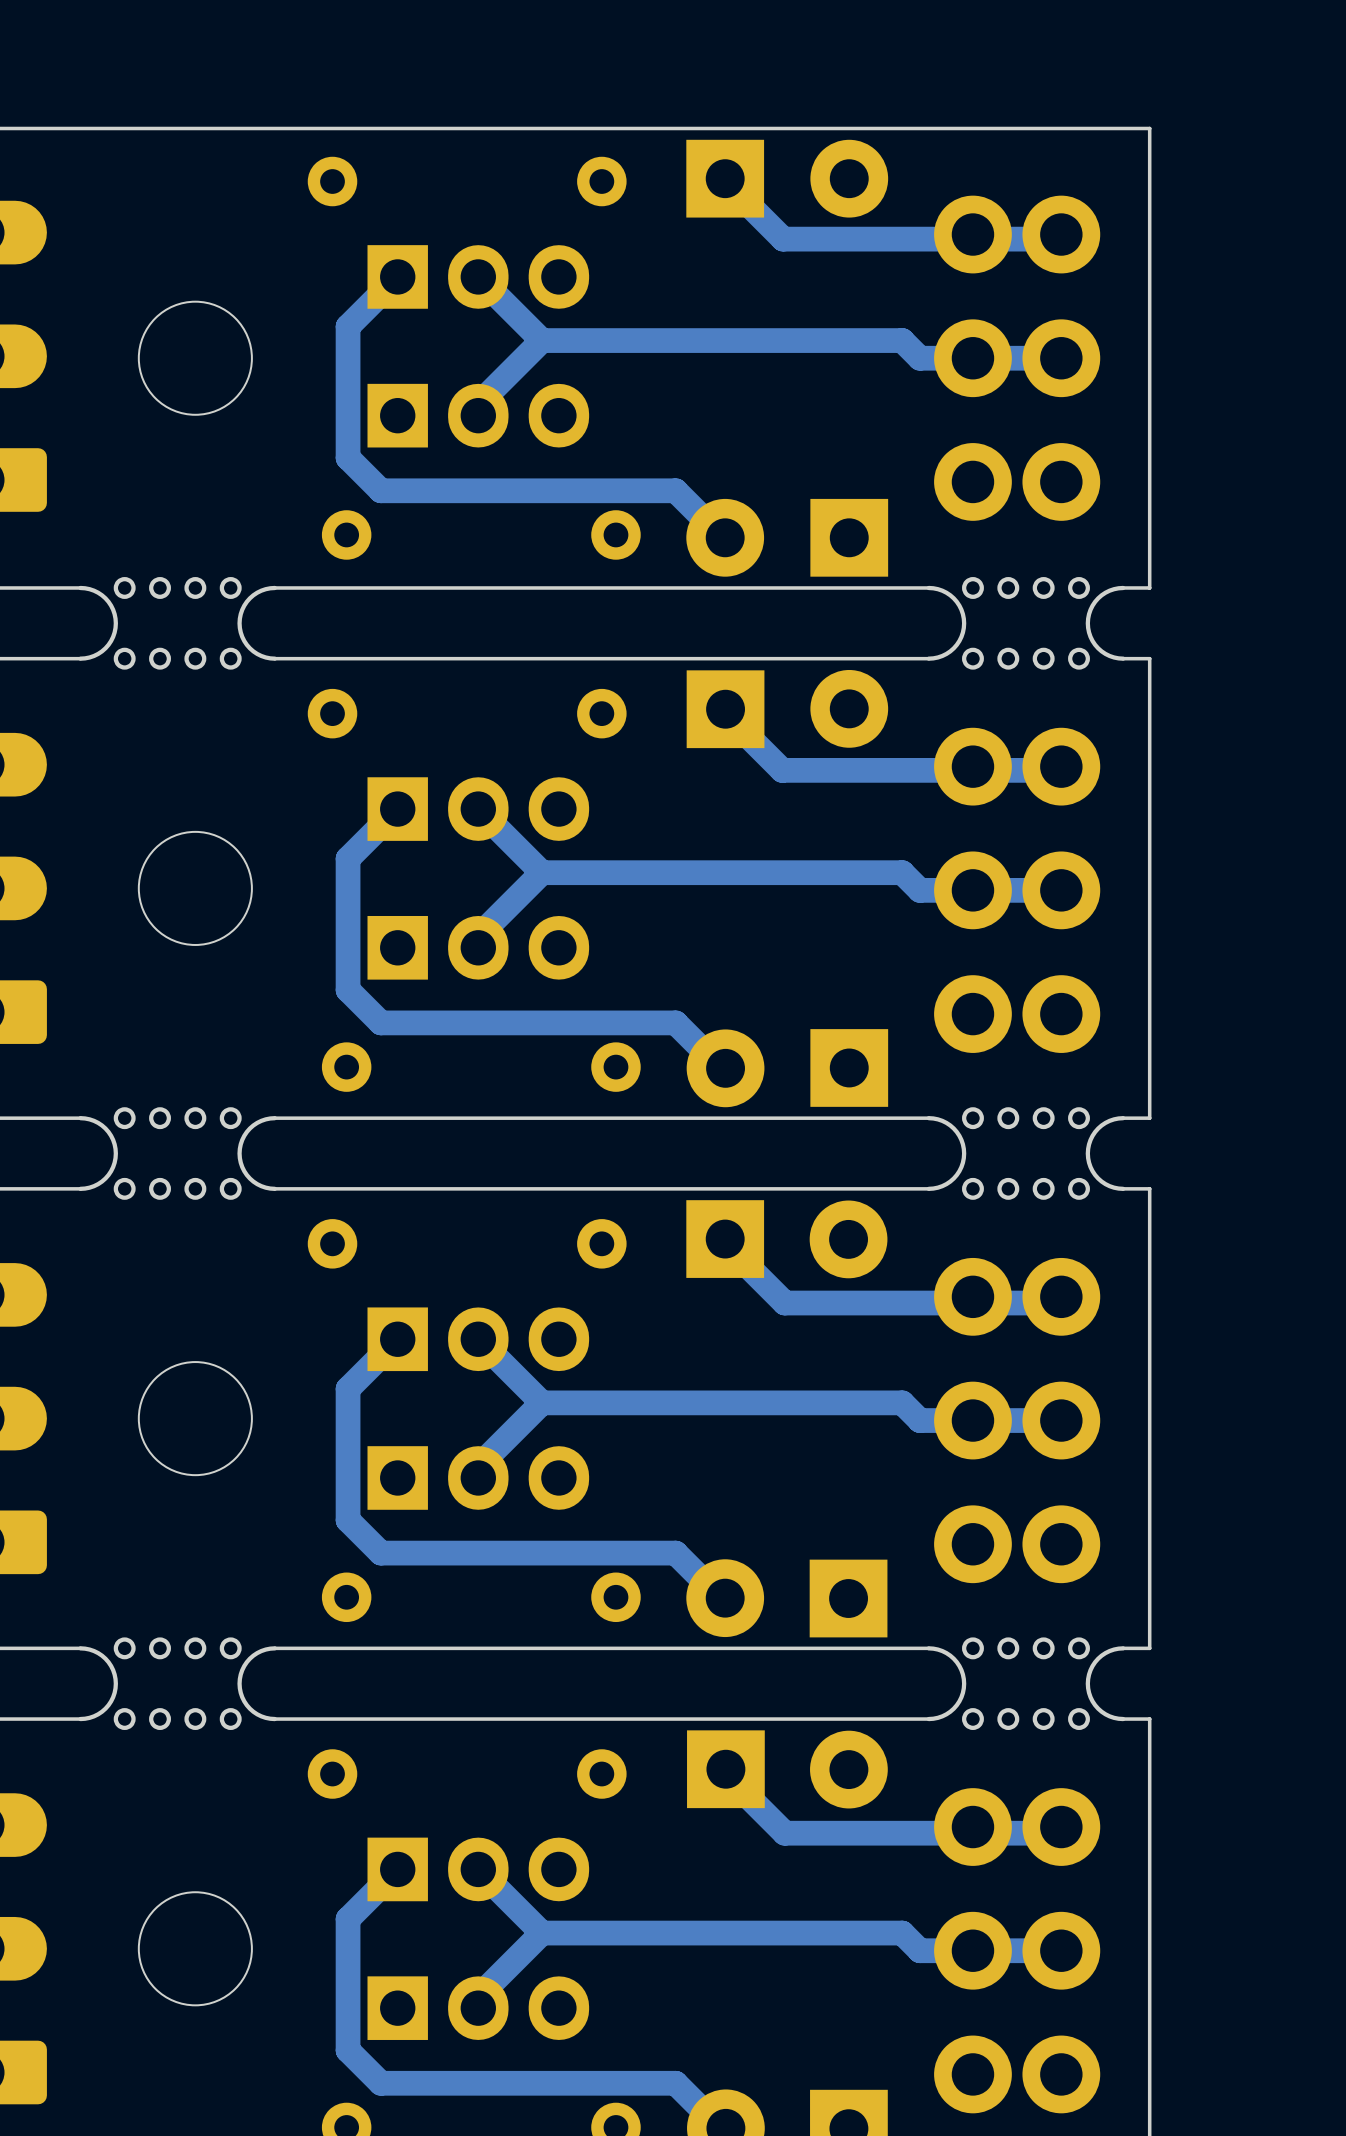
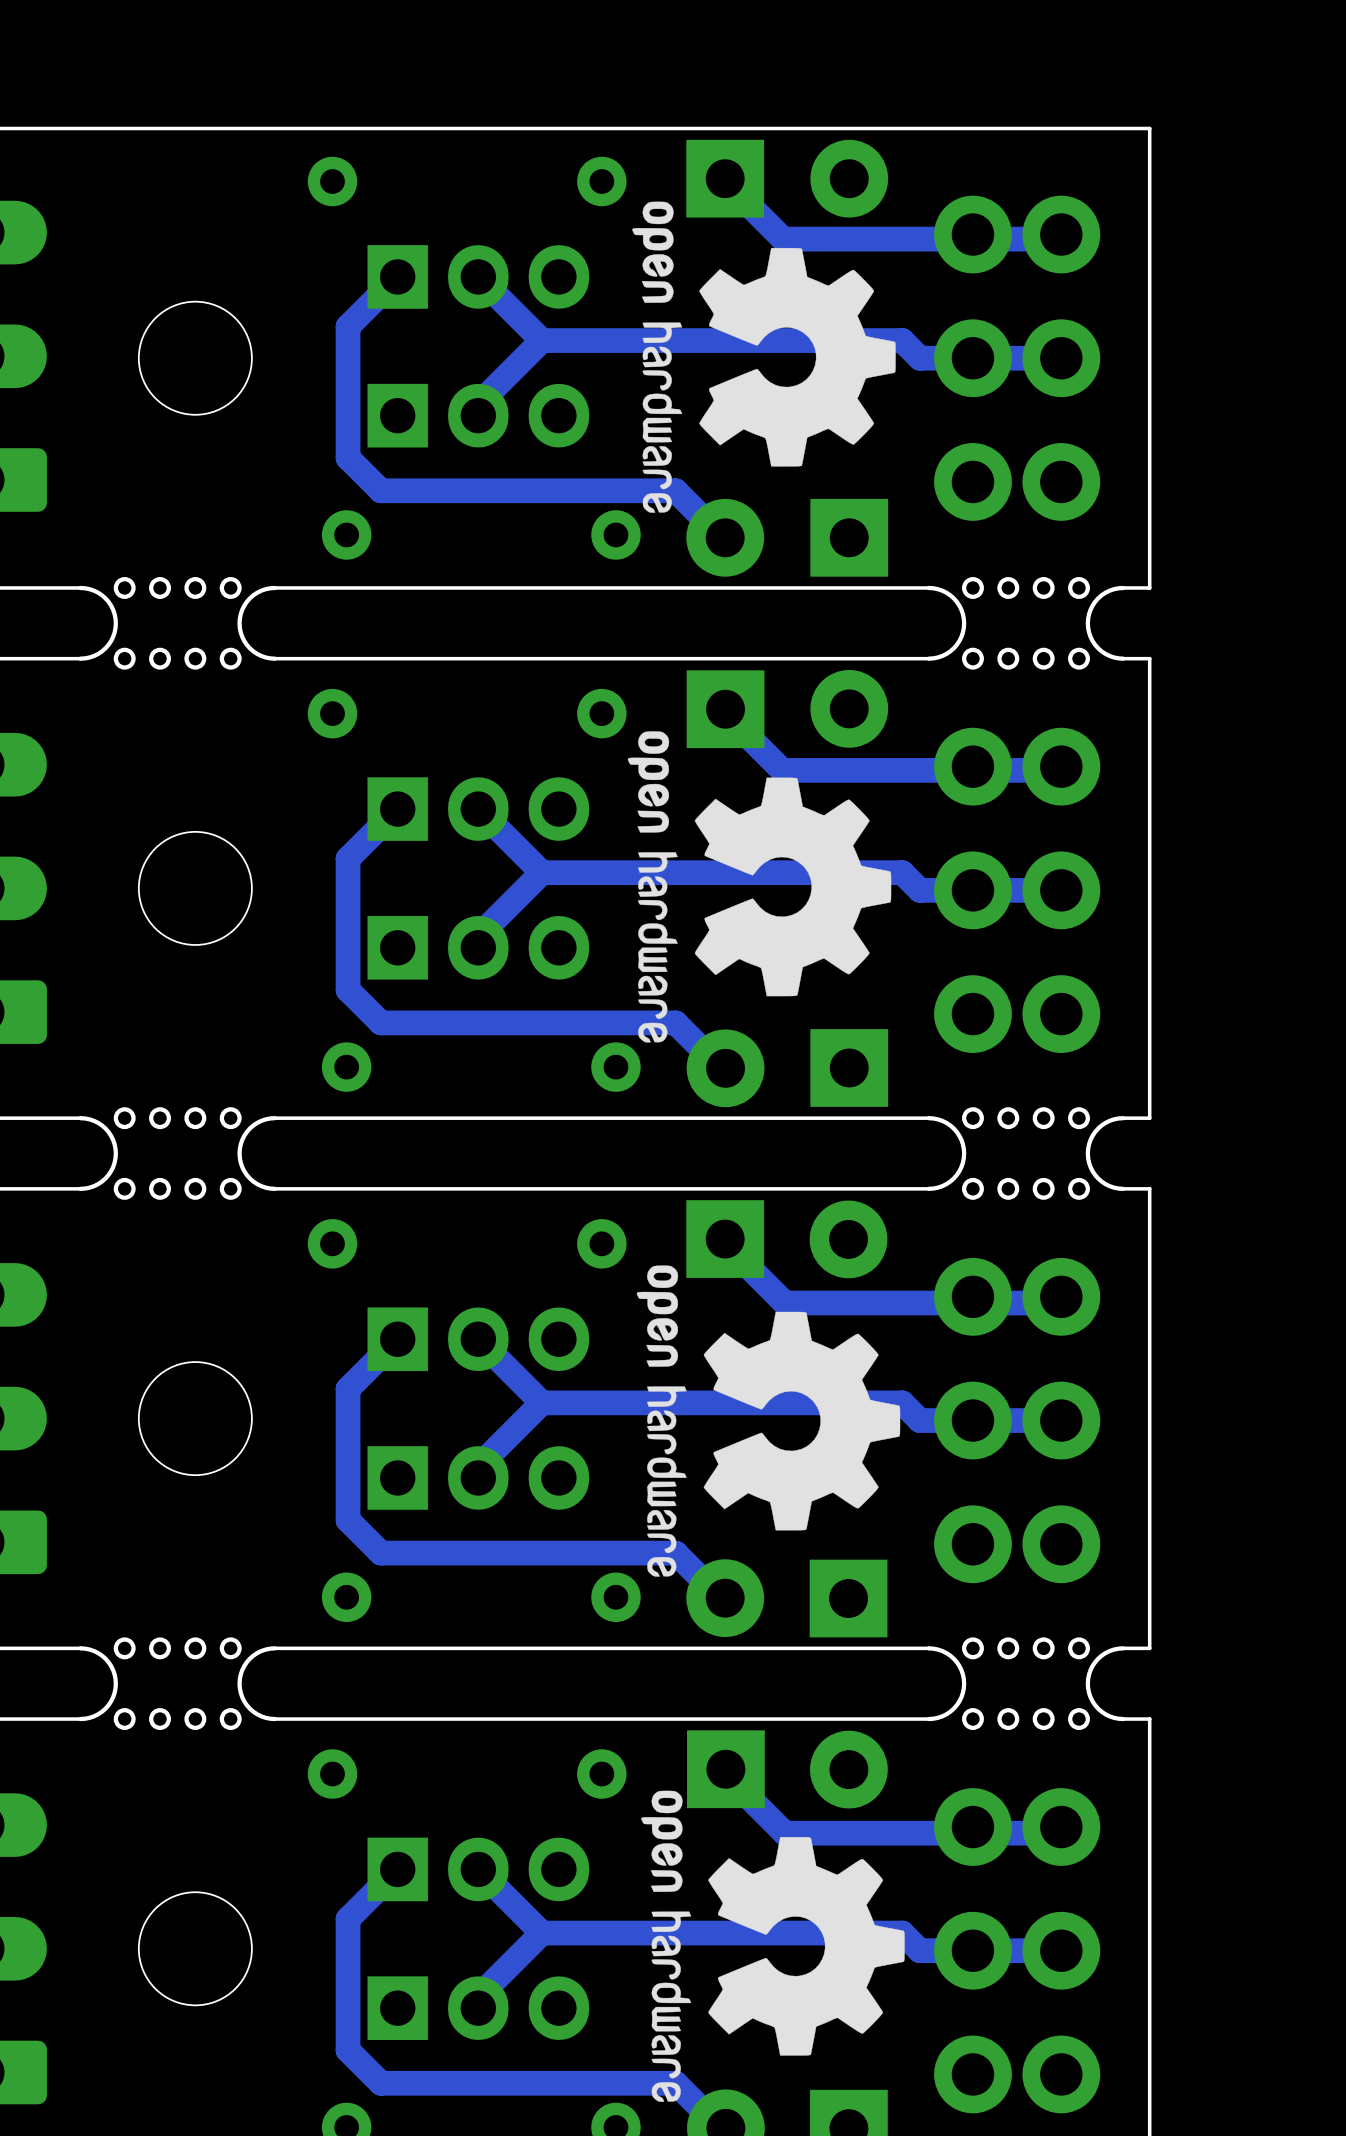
drawing: none -> [632, 201, 896, 513]
drawing: none -> [627, 731, 892, 1043]
drawing: none -> [636, 1265, 901, 1577]
drawing: none -> [641, 1790, 905, 2102]

